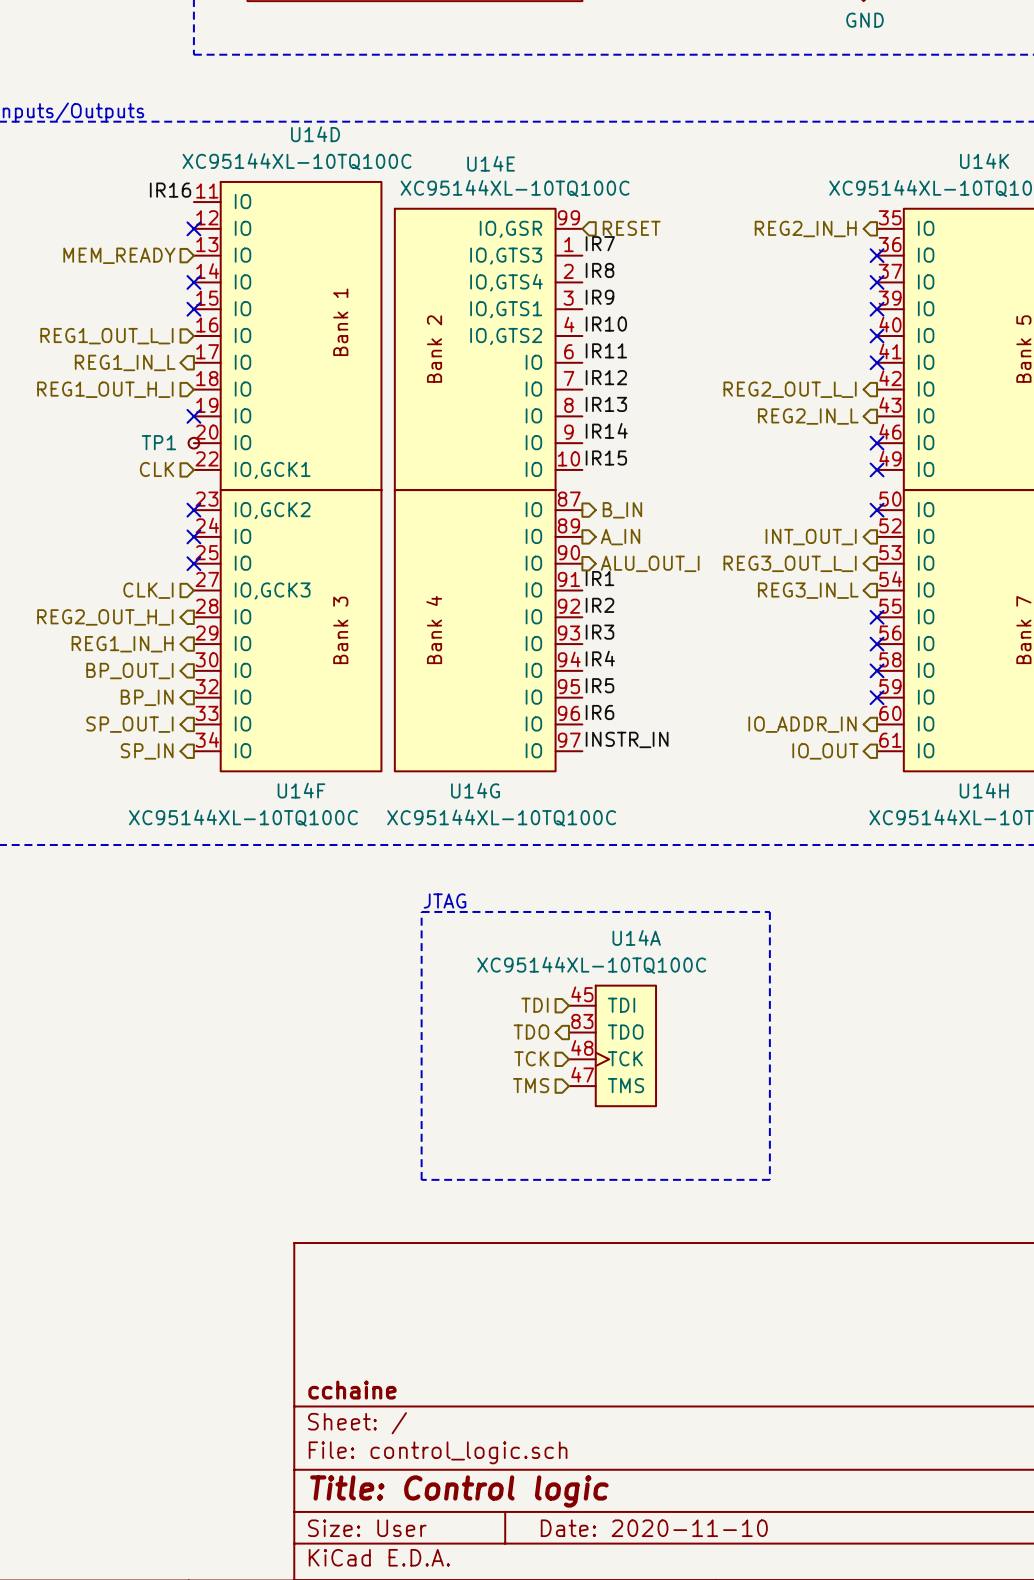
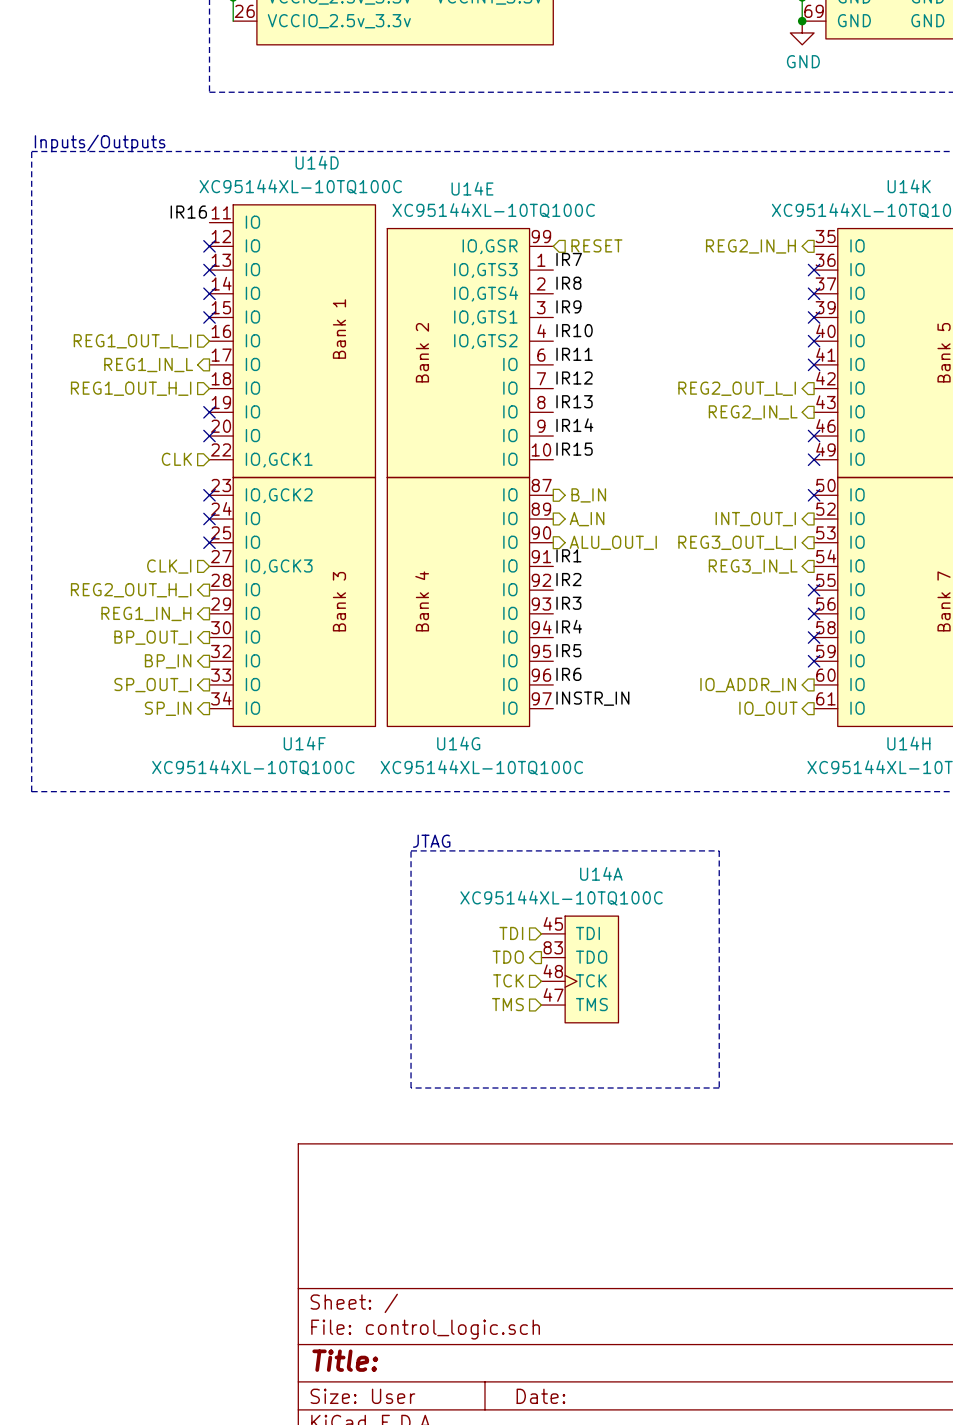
hierarchical label: MEM_READY (119, 255) -> none
no-connect mark: none -> (209, 270)
TP1: (193, 443) -> none
no-connect mark: none -> (209, 436)
title block: cchaine (352, 1390) -> none
title block: Title: Control logic (459, 1491) -> Title: (345, 1360)
title block: Date: 2020-11-10 (654, 1528) -> Date: (540, 1396)

